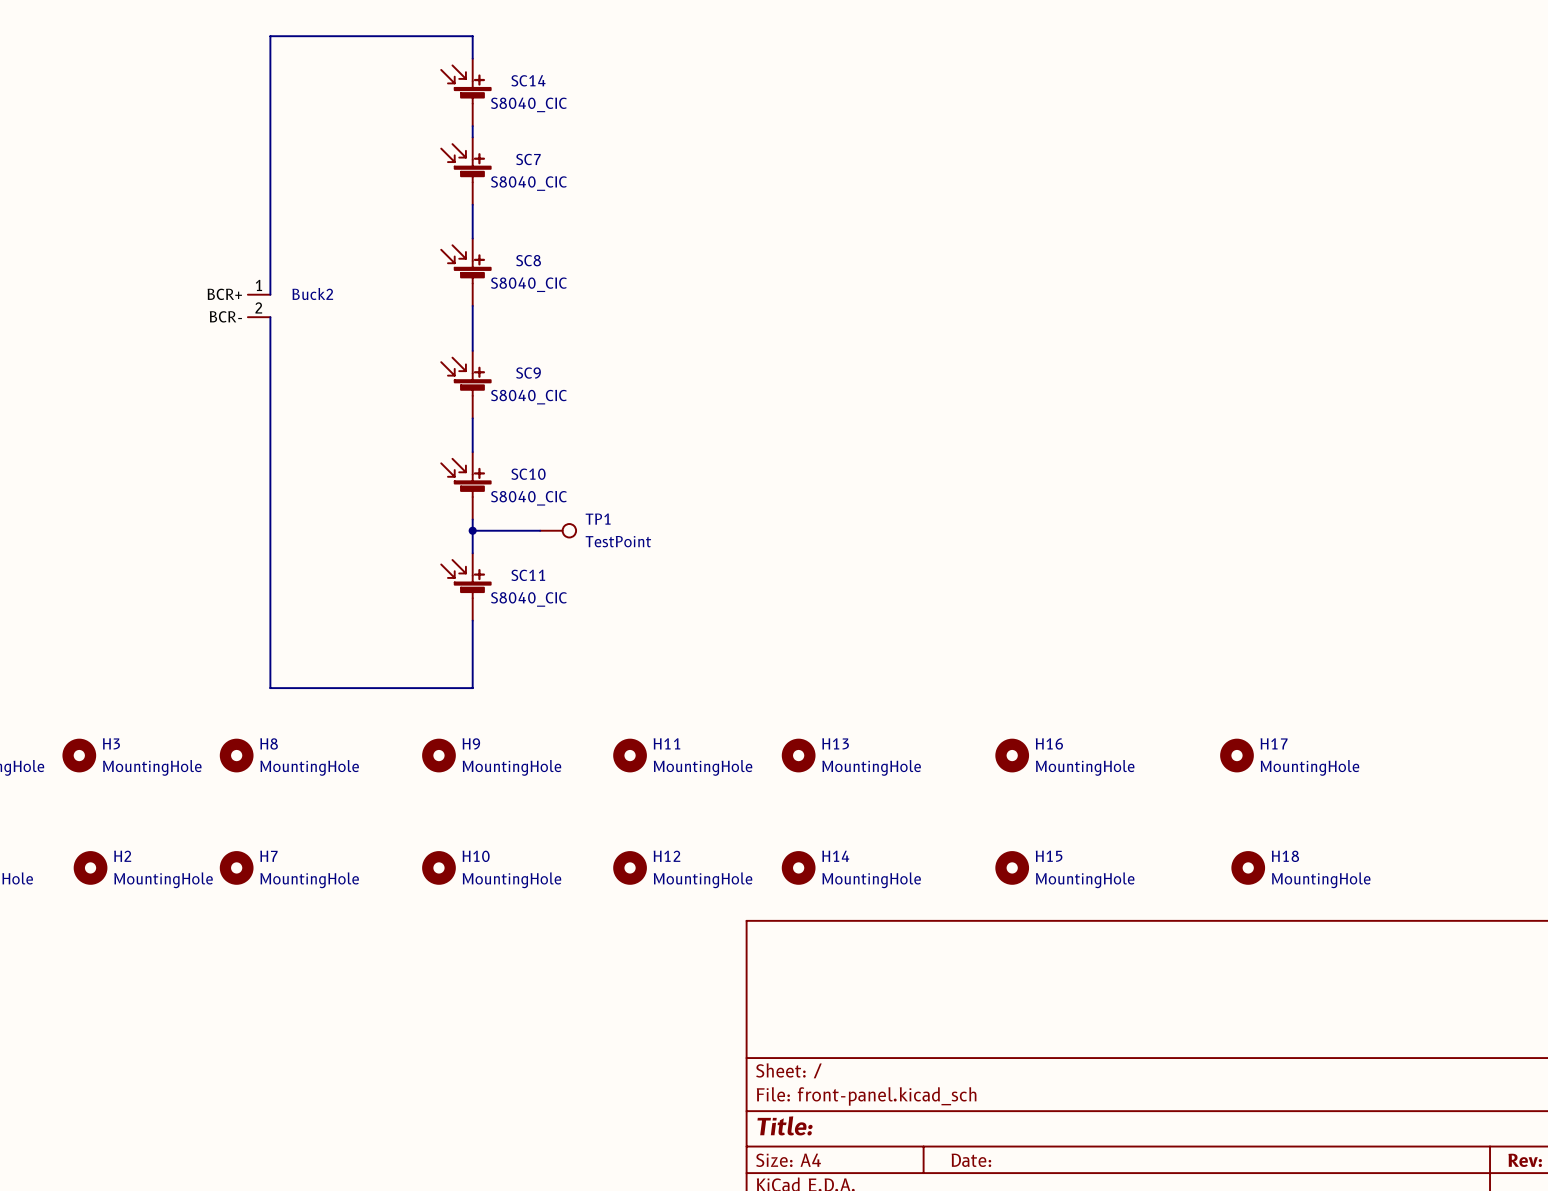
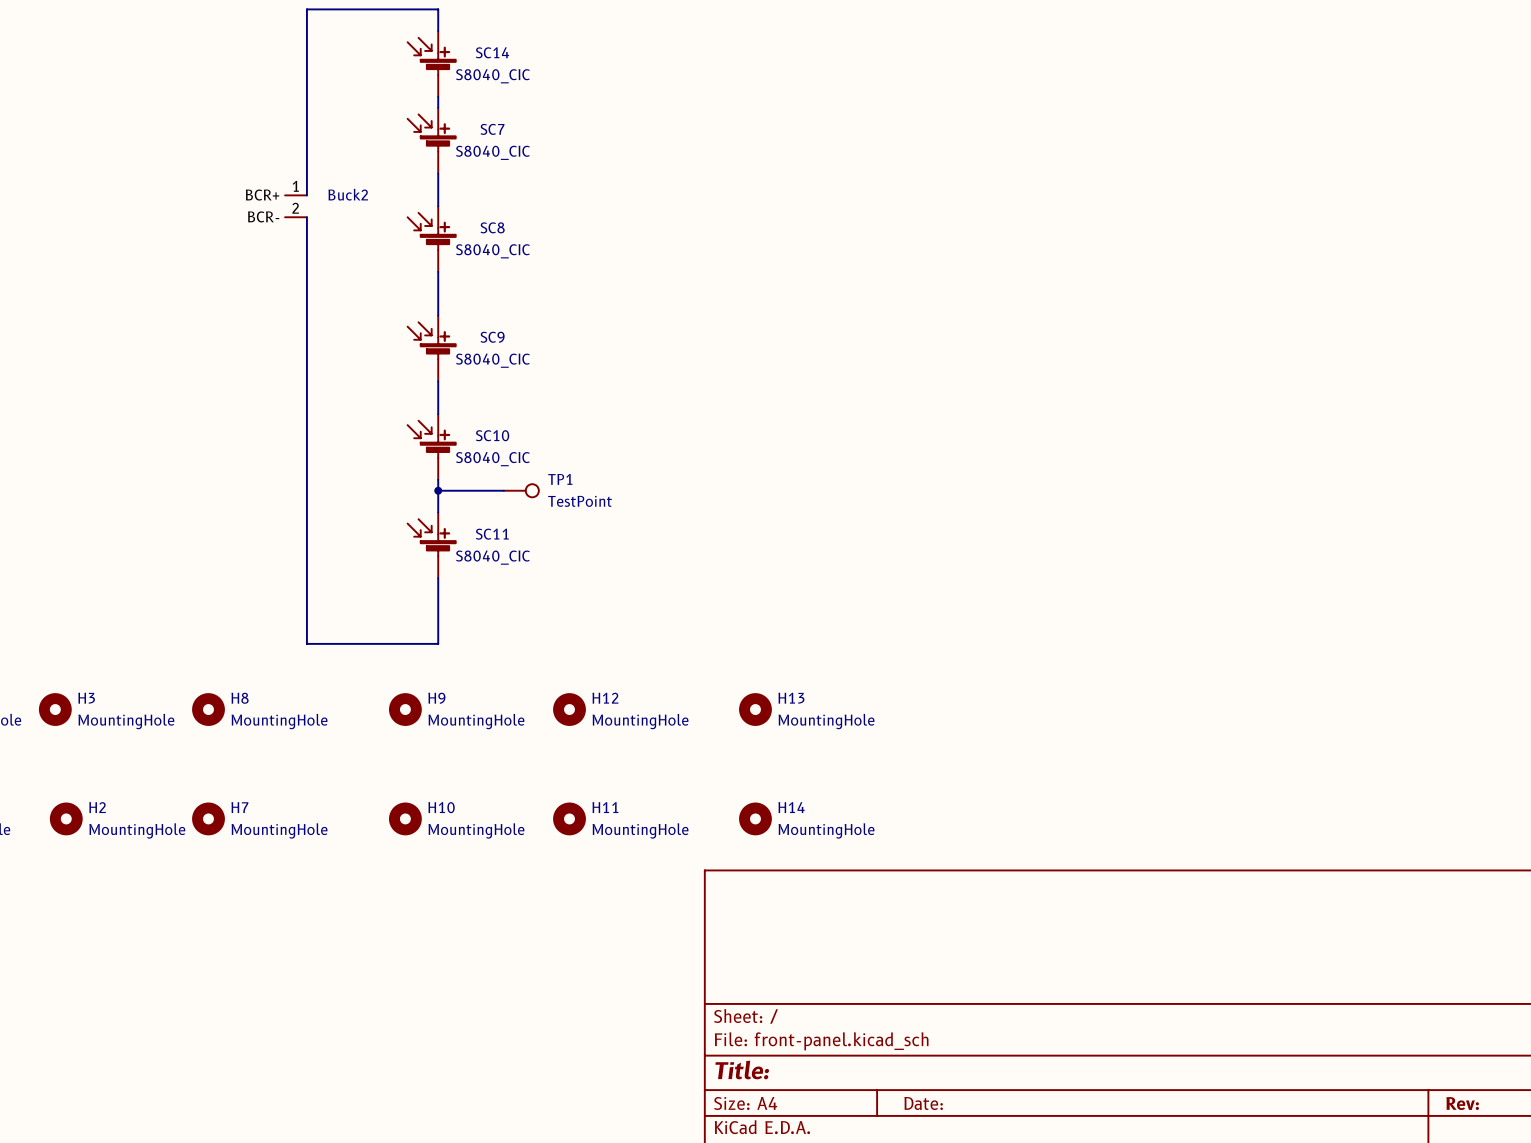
wire: (337, 36) (270, 36) (270, 294) -> (306, 9) (306, 195)
Buck2 position: (259, 305) -> (296, 206)
wire: (270, 317) (270, 688) (337, 688) -> (306, 217) (306, 643)
H11 position: (630, 755) -> (569, 818)
H16: MountingHole (1012, 755) -> none
H17: MountingHole (1236, 755) -> none
H12 position: (630, 867) -> (569, 709)
H15: MountingHole (1012, 867) -> none
H18: MountingHole (1248, 867) -> none

